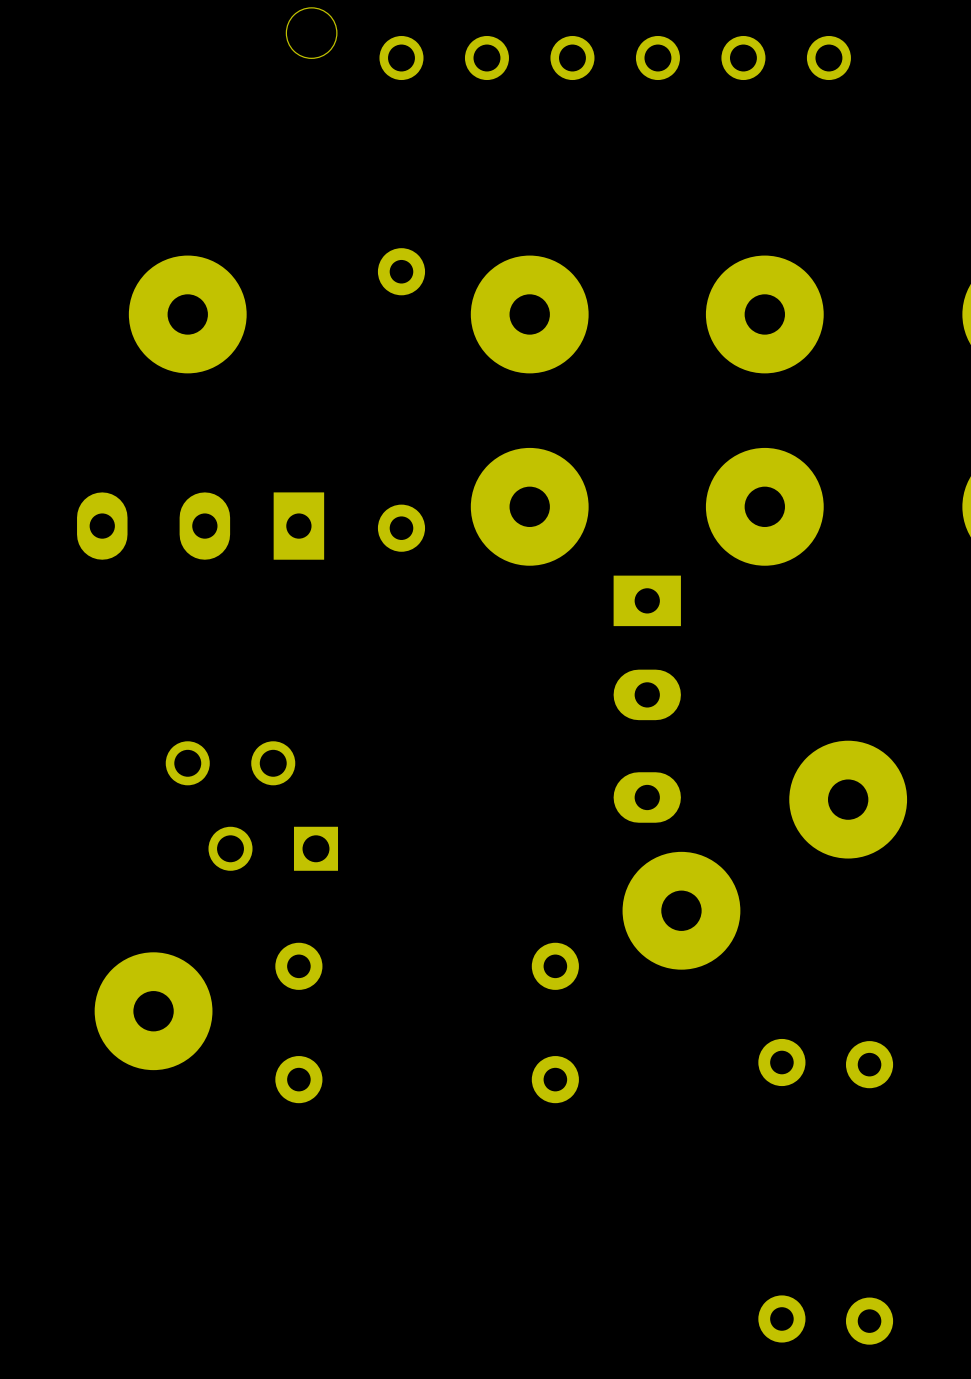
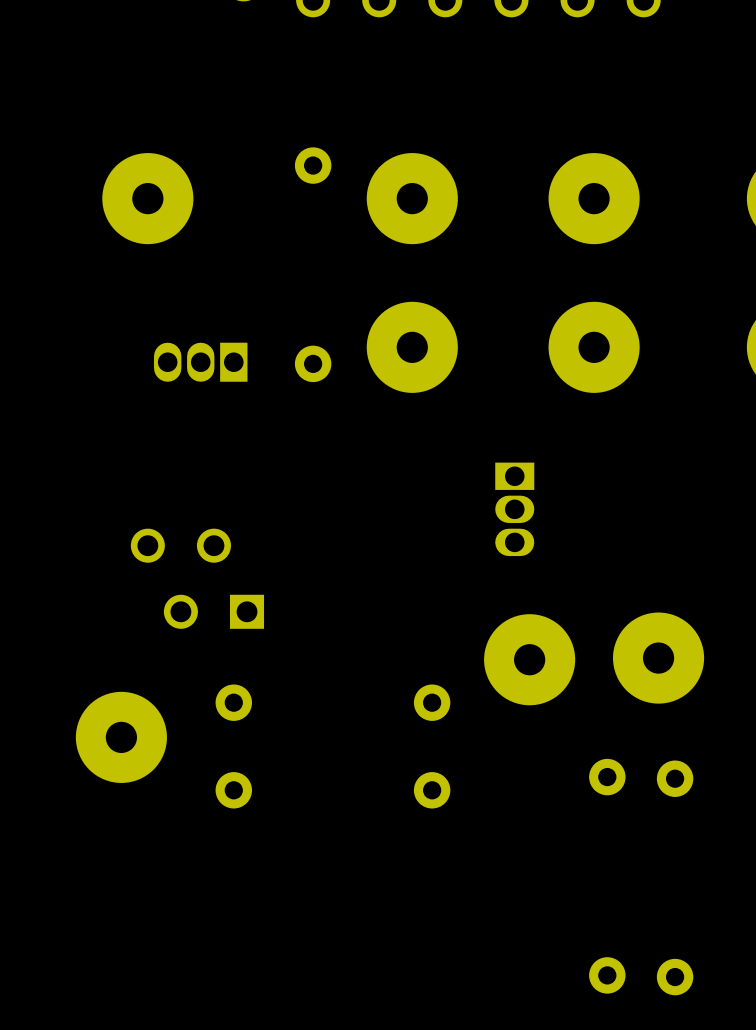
part: (200, 526) -> none
part: none -> (200, 362)
part footprint: [613, 575, 681, 823] -> [495, 462, 535, 557]
part position: (848, 799) -> (658, 658)

